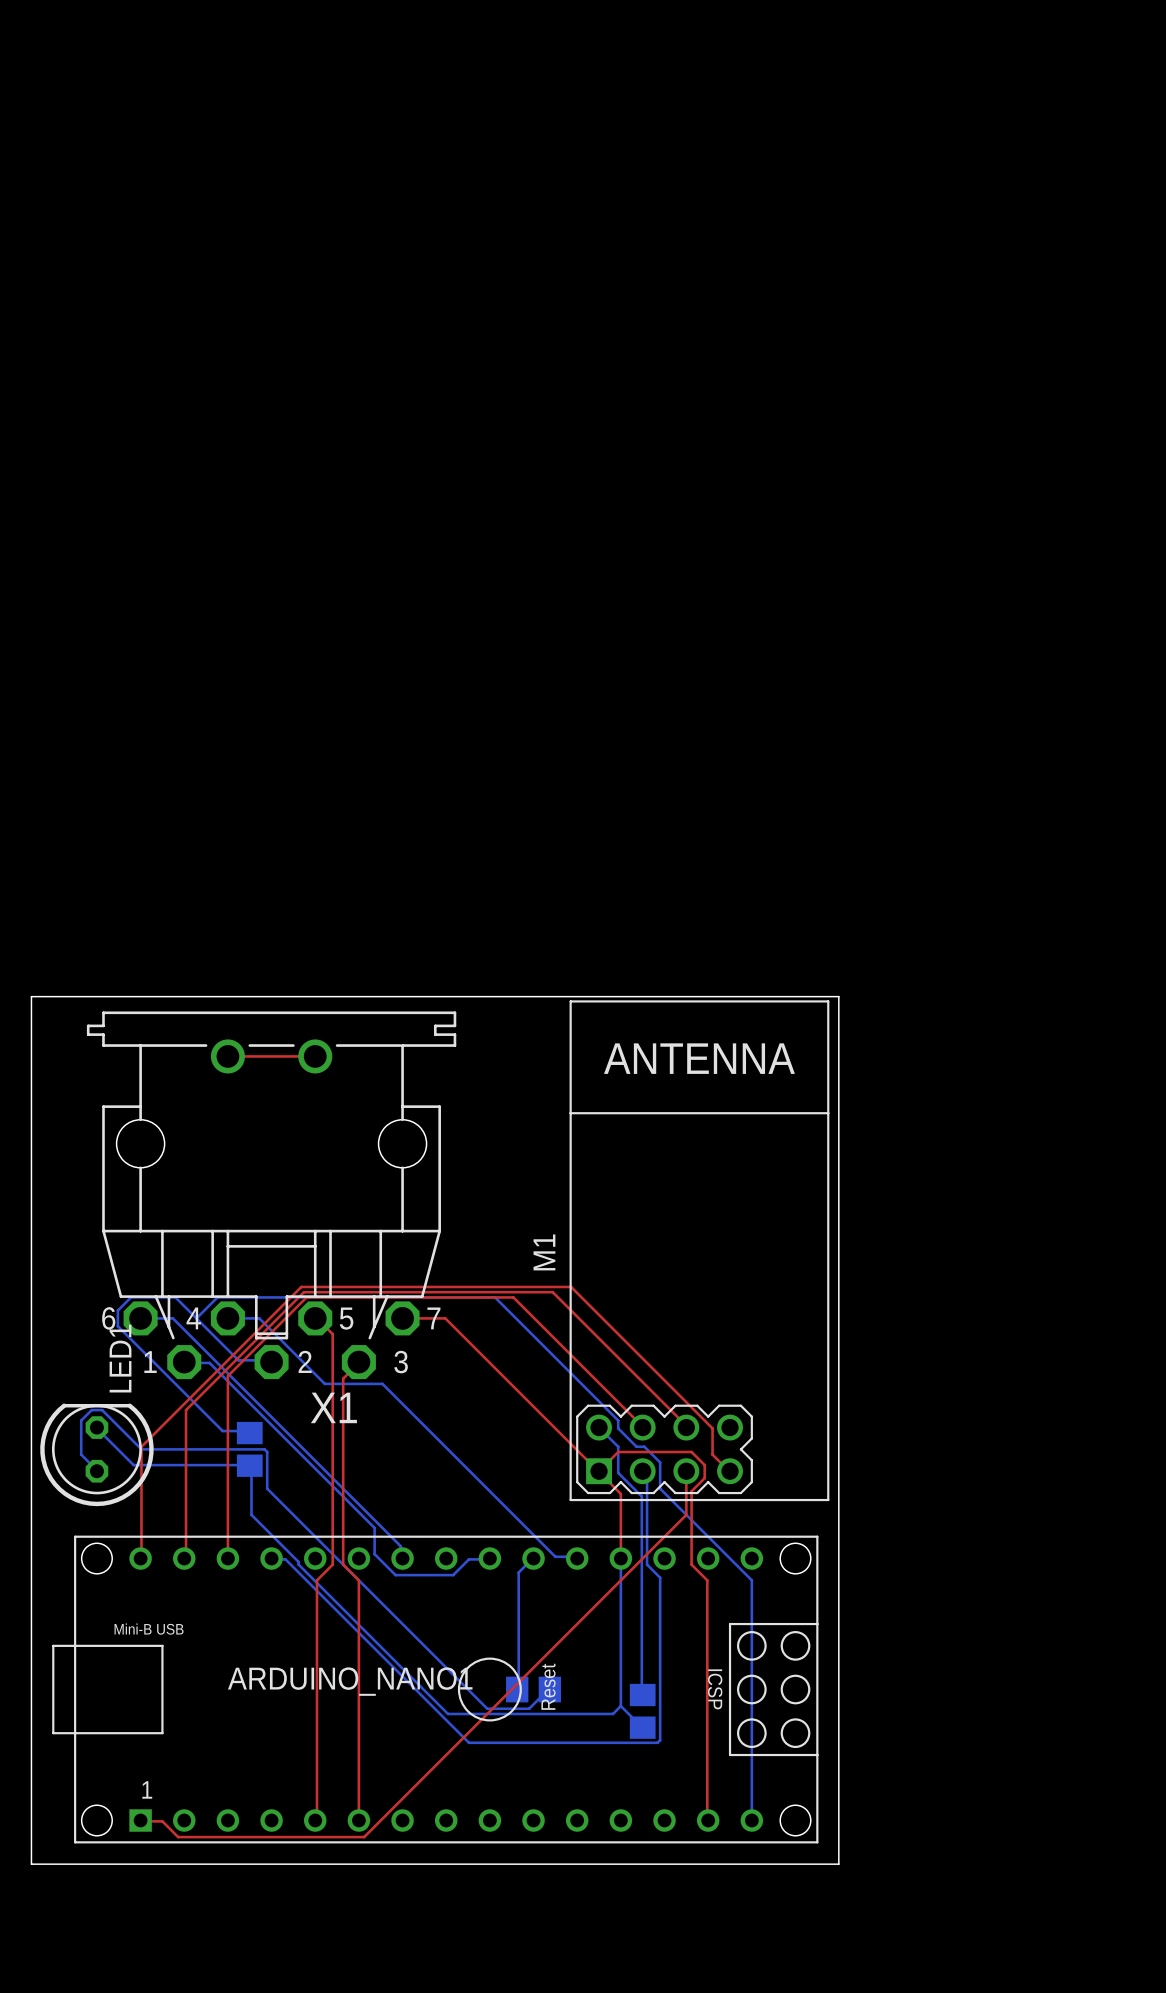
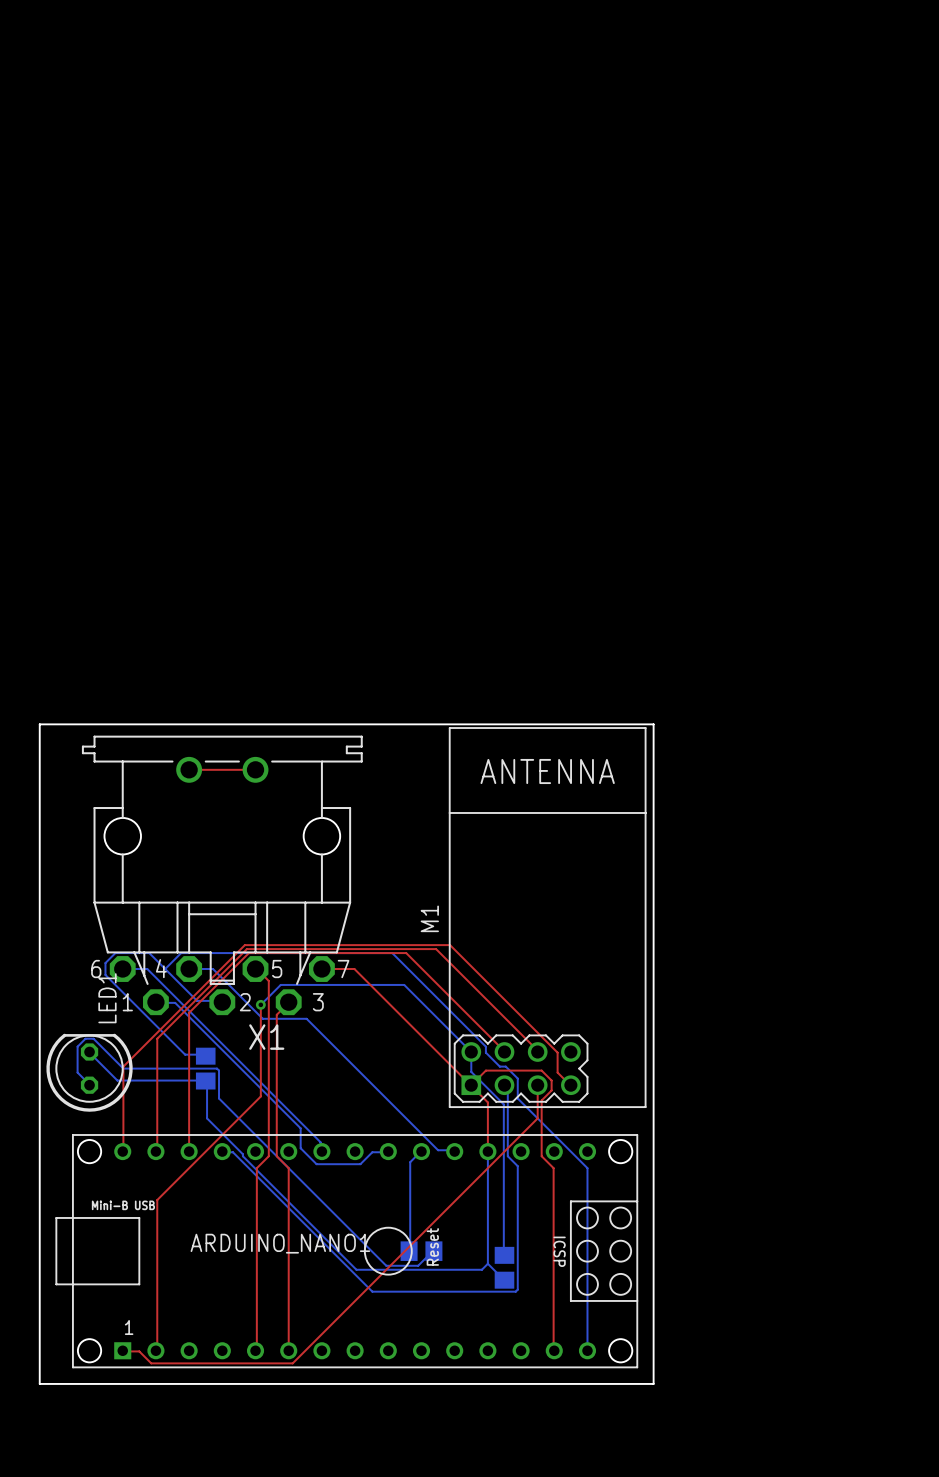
top track: none -> (260, 1004) (260, 1096) (157, 1200) (155, 1350)
via: none -> (260, 1004)
bottom track: (599, 1427) (618, 1446) (618, 1472) -> (260, 1004) (280, 984) (404, 984) (471, 1052) (471, 1071) (485, 1086)

